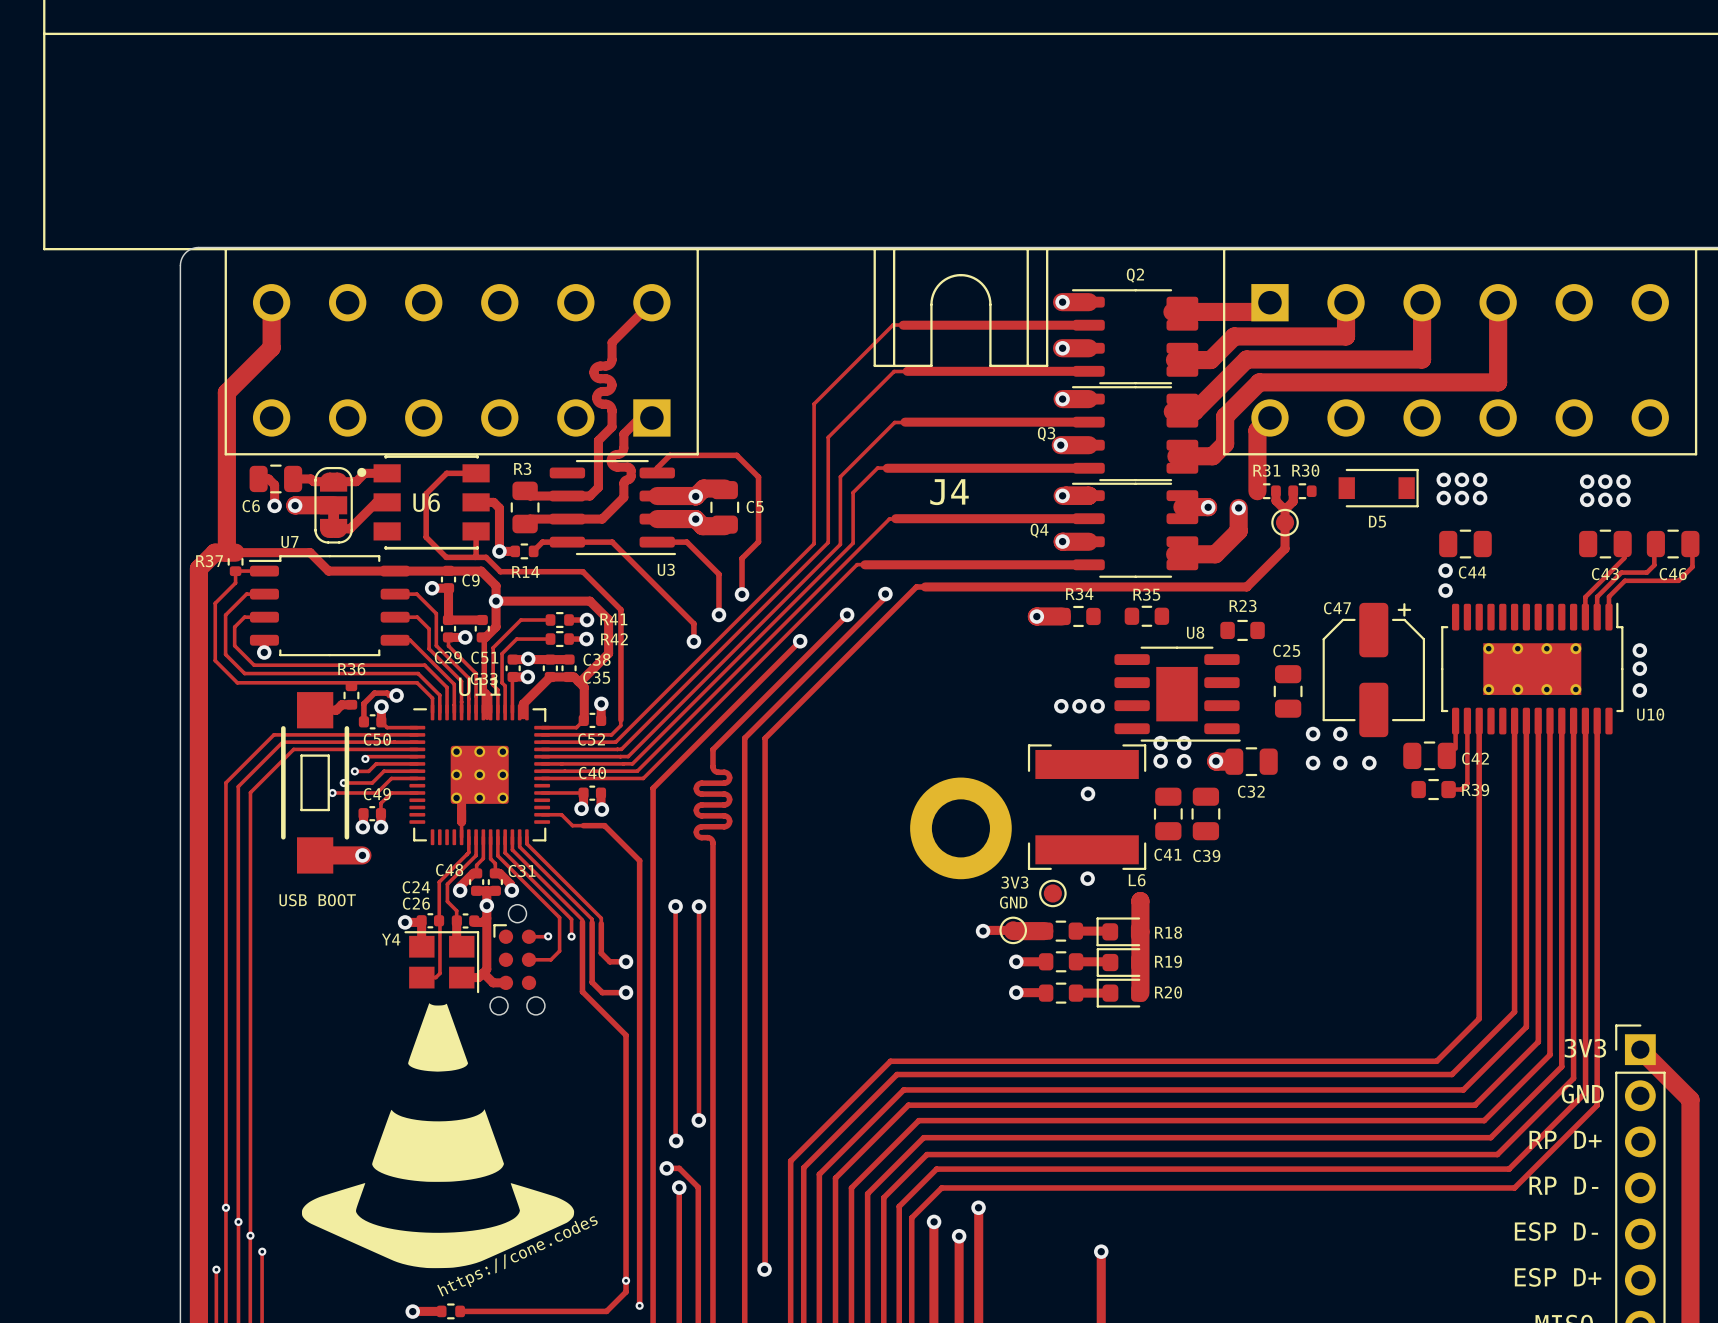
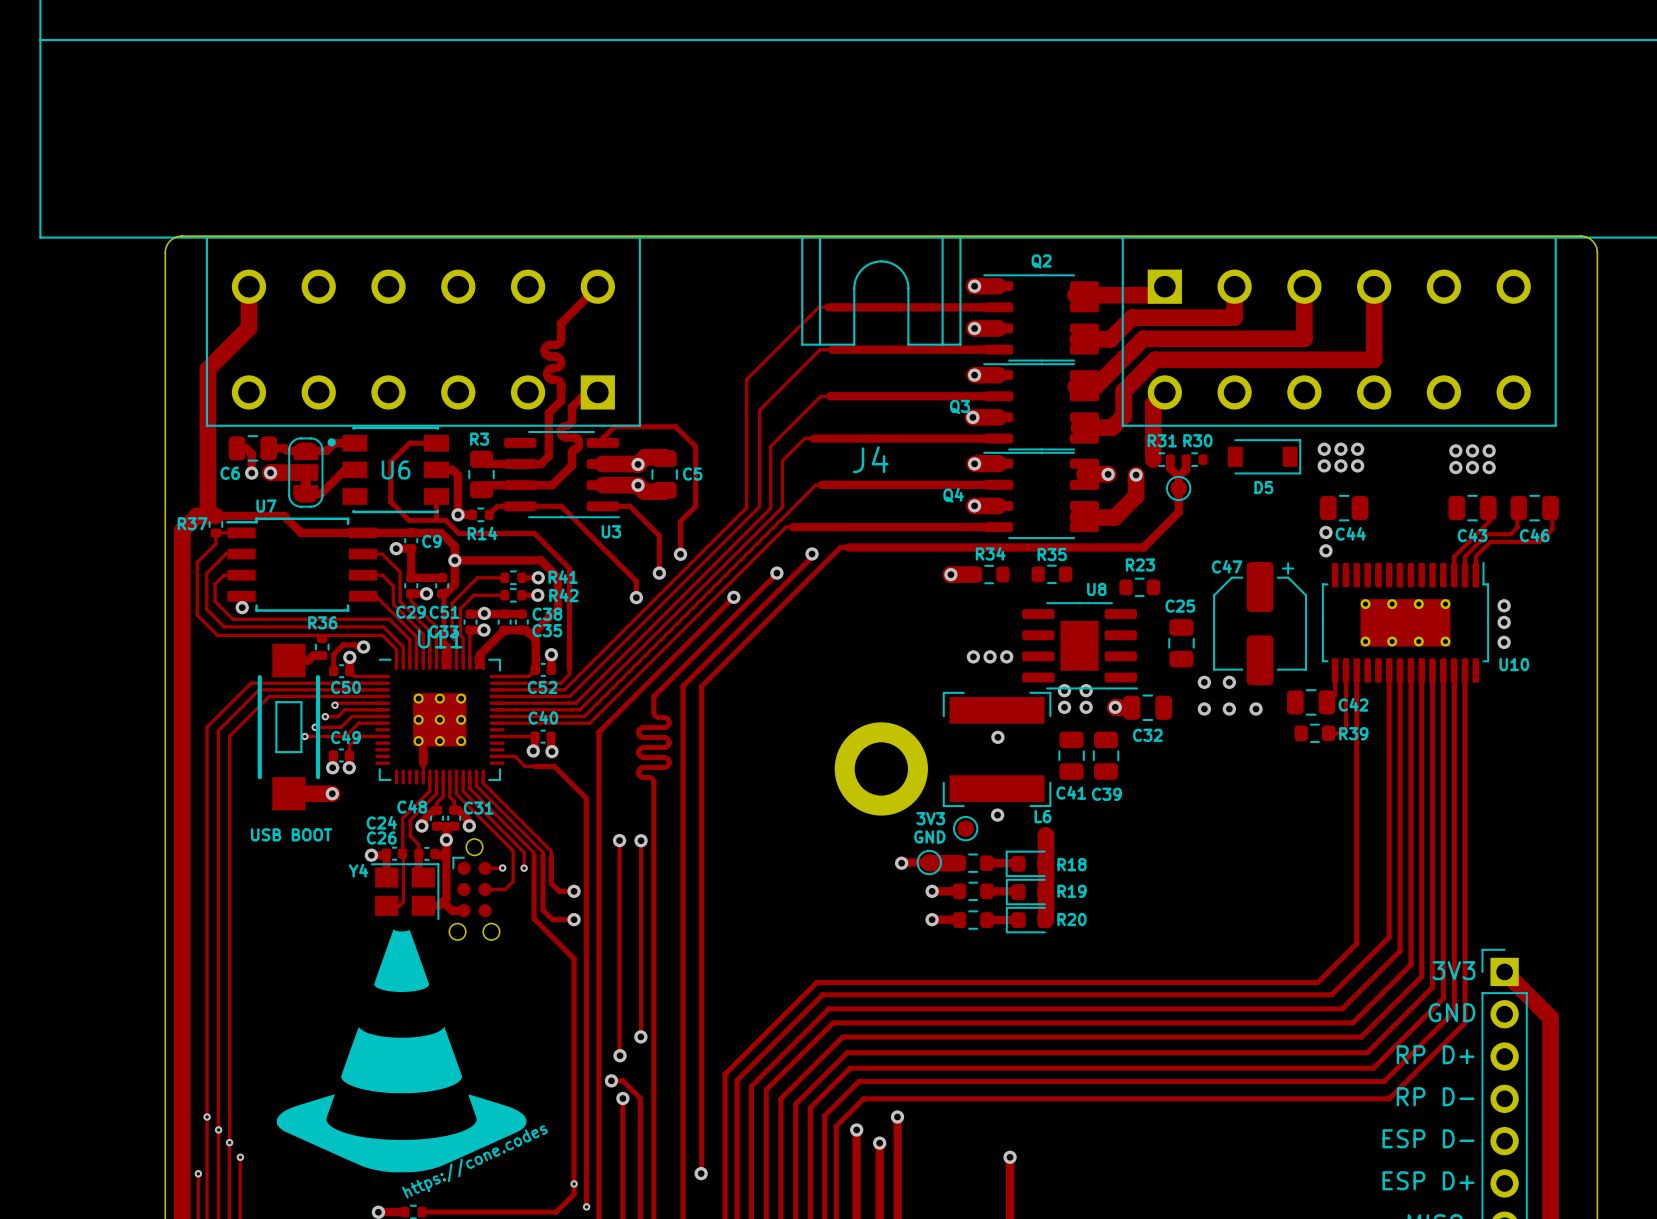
U7 footprint: [248, 555, 410, 657] -> [226, 517, 378, 612]

